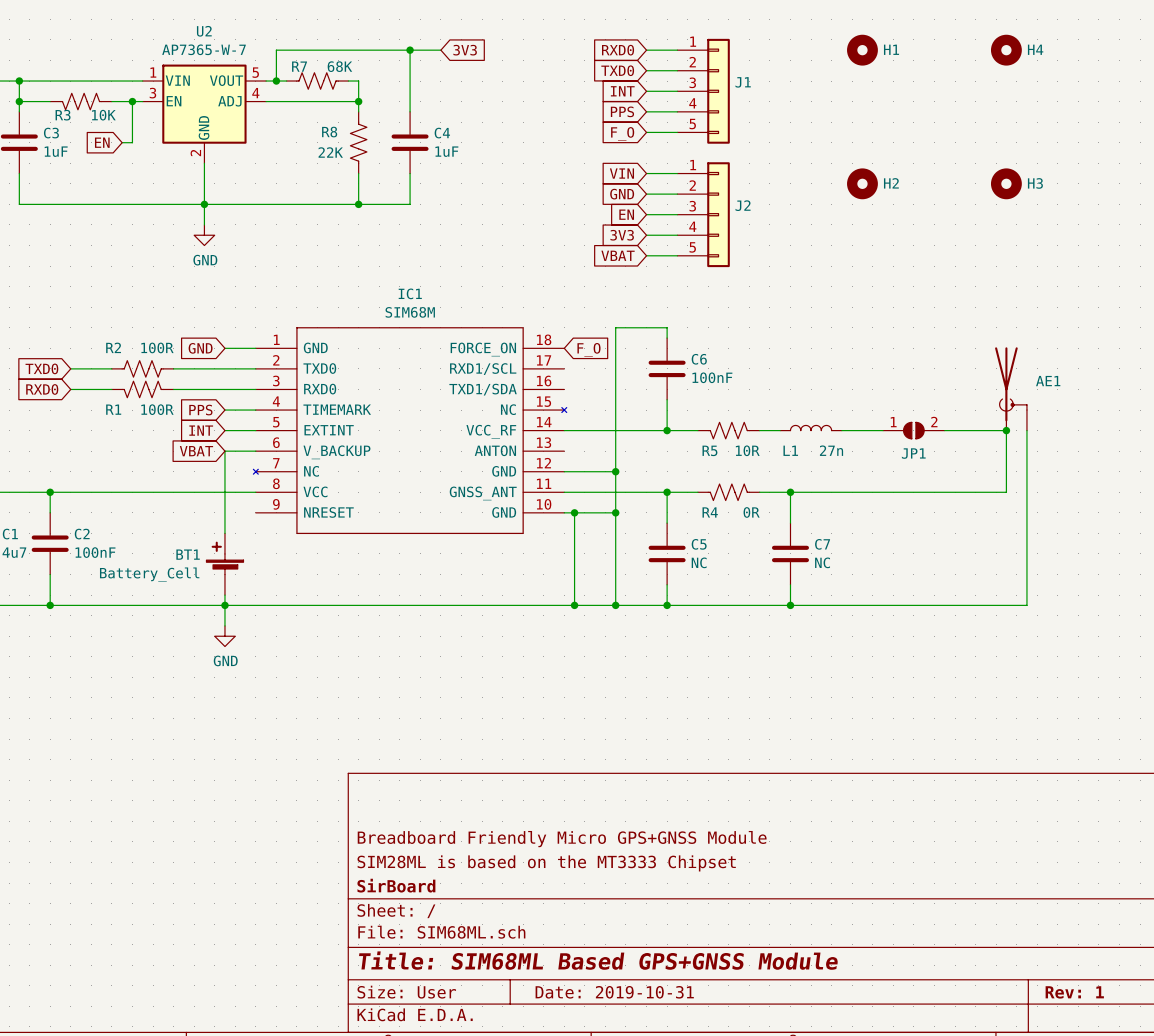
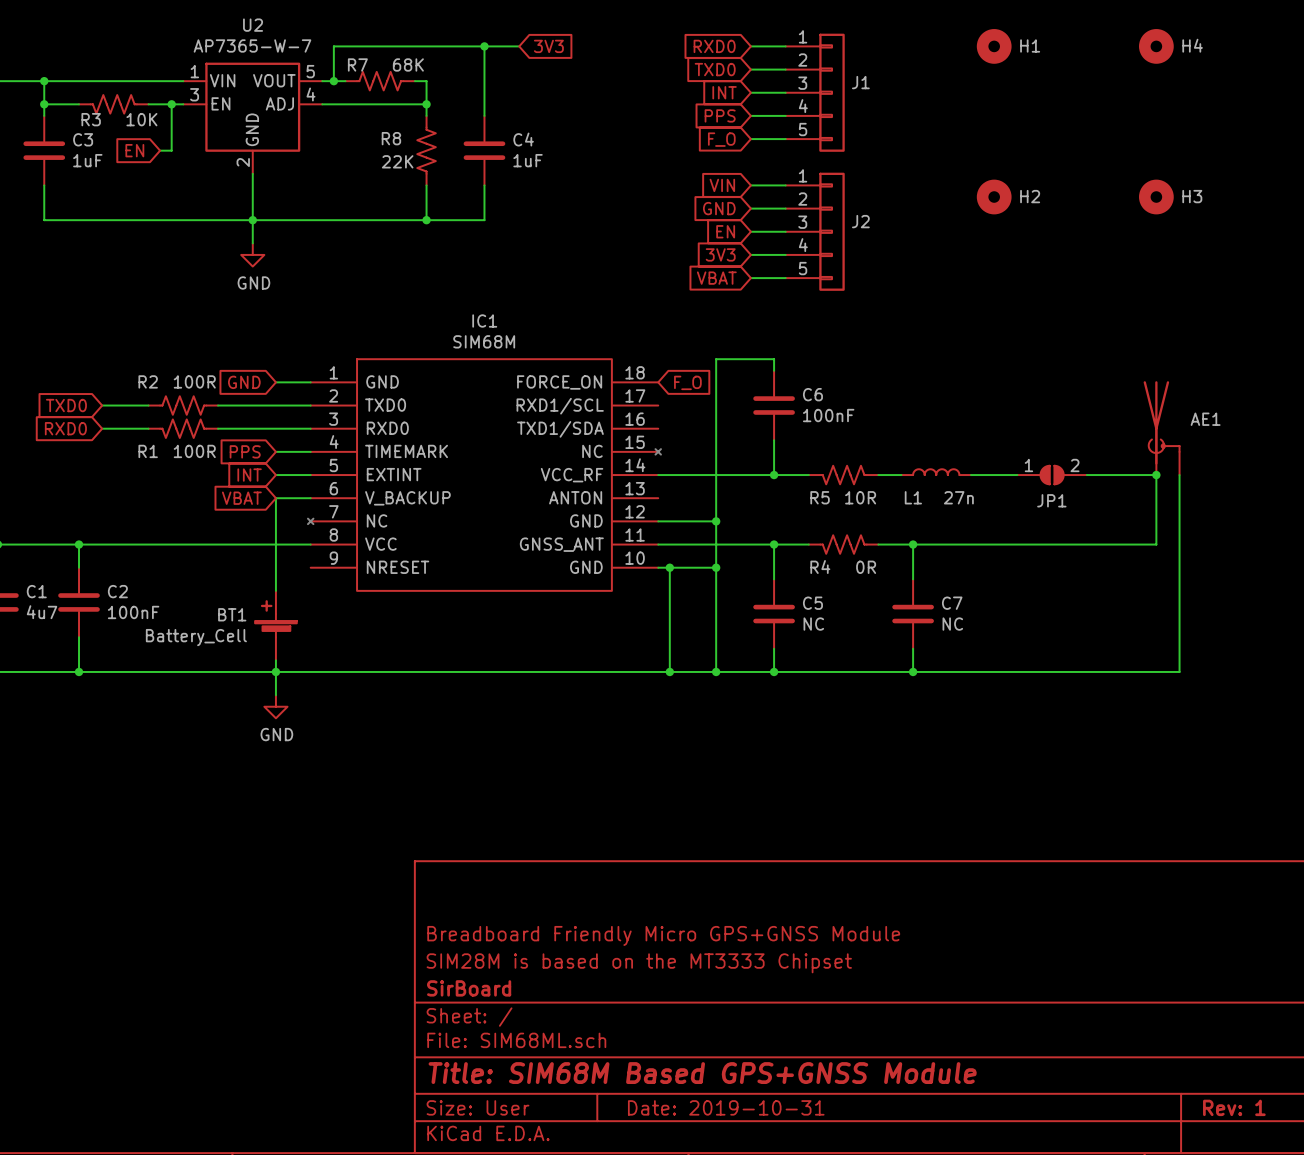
title block: SIM28ML is based on the MT3333 Chipset (546, 863) -> SIM28M is based on the MT3333 Chipset (639, 963)
title block: Title: SIM68ML Based GPS+GNSS Module (598, 960) -> Title: SIM68M Based GPS+GNSS Module (702, 1073)

